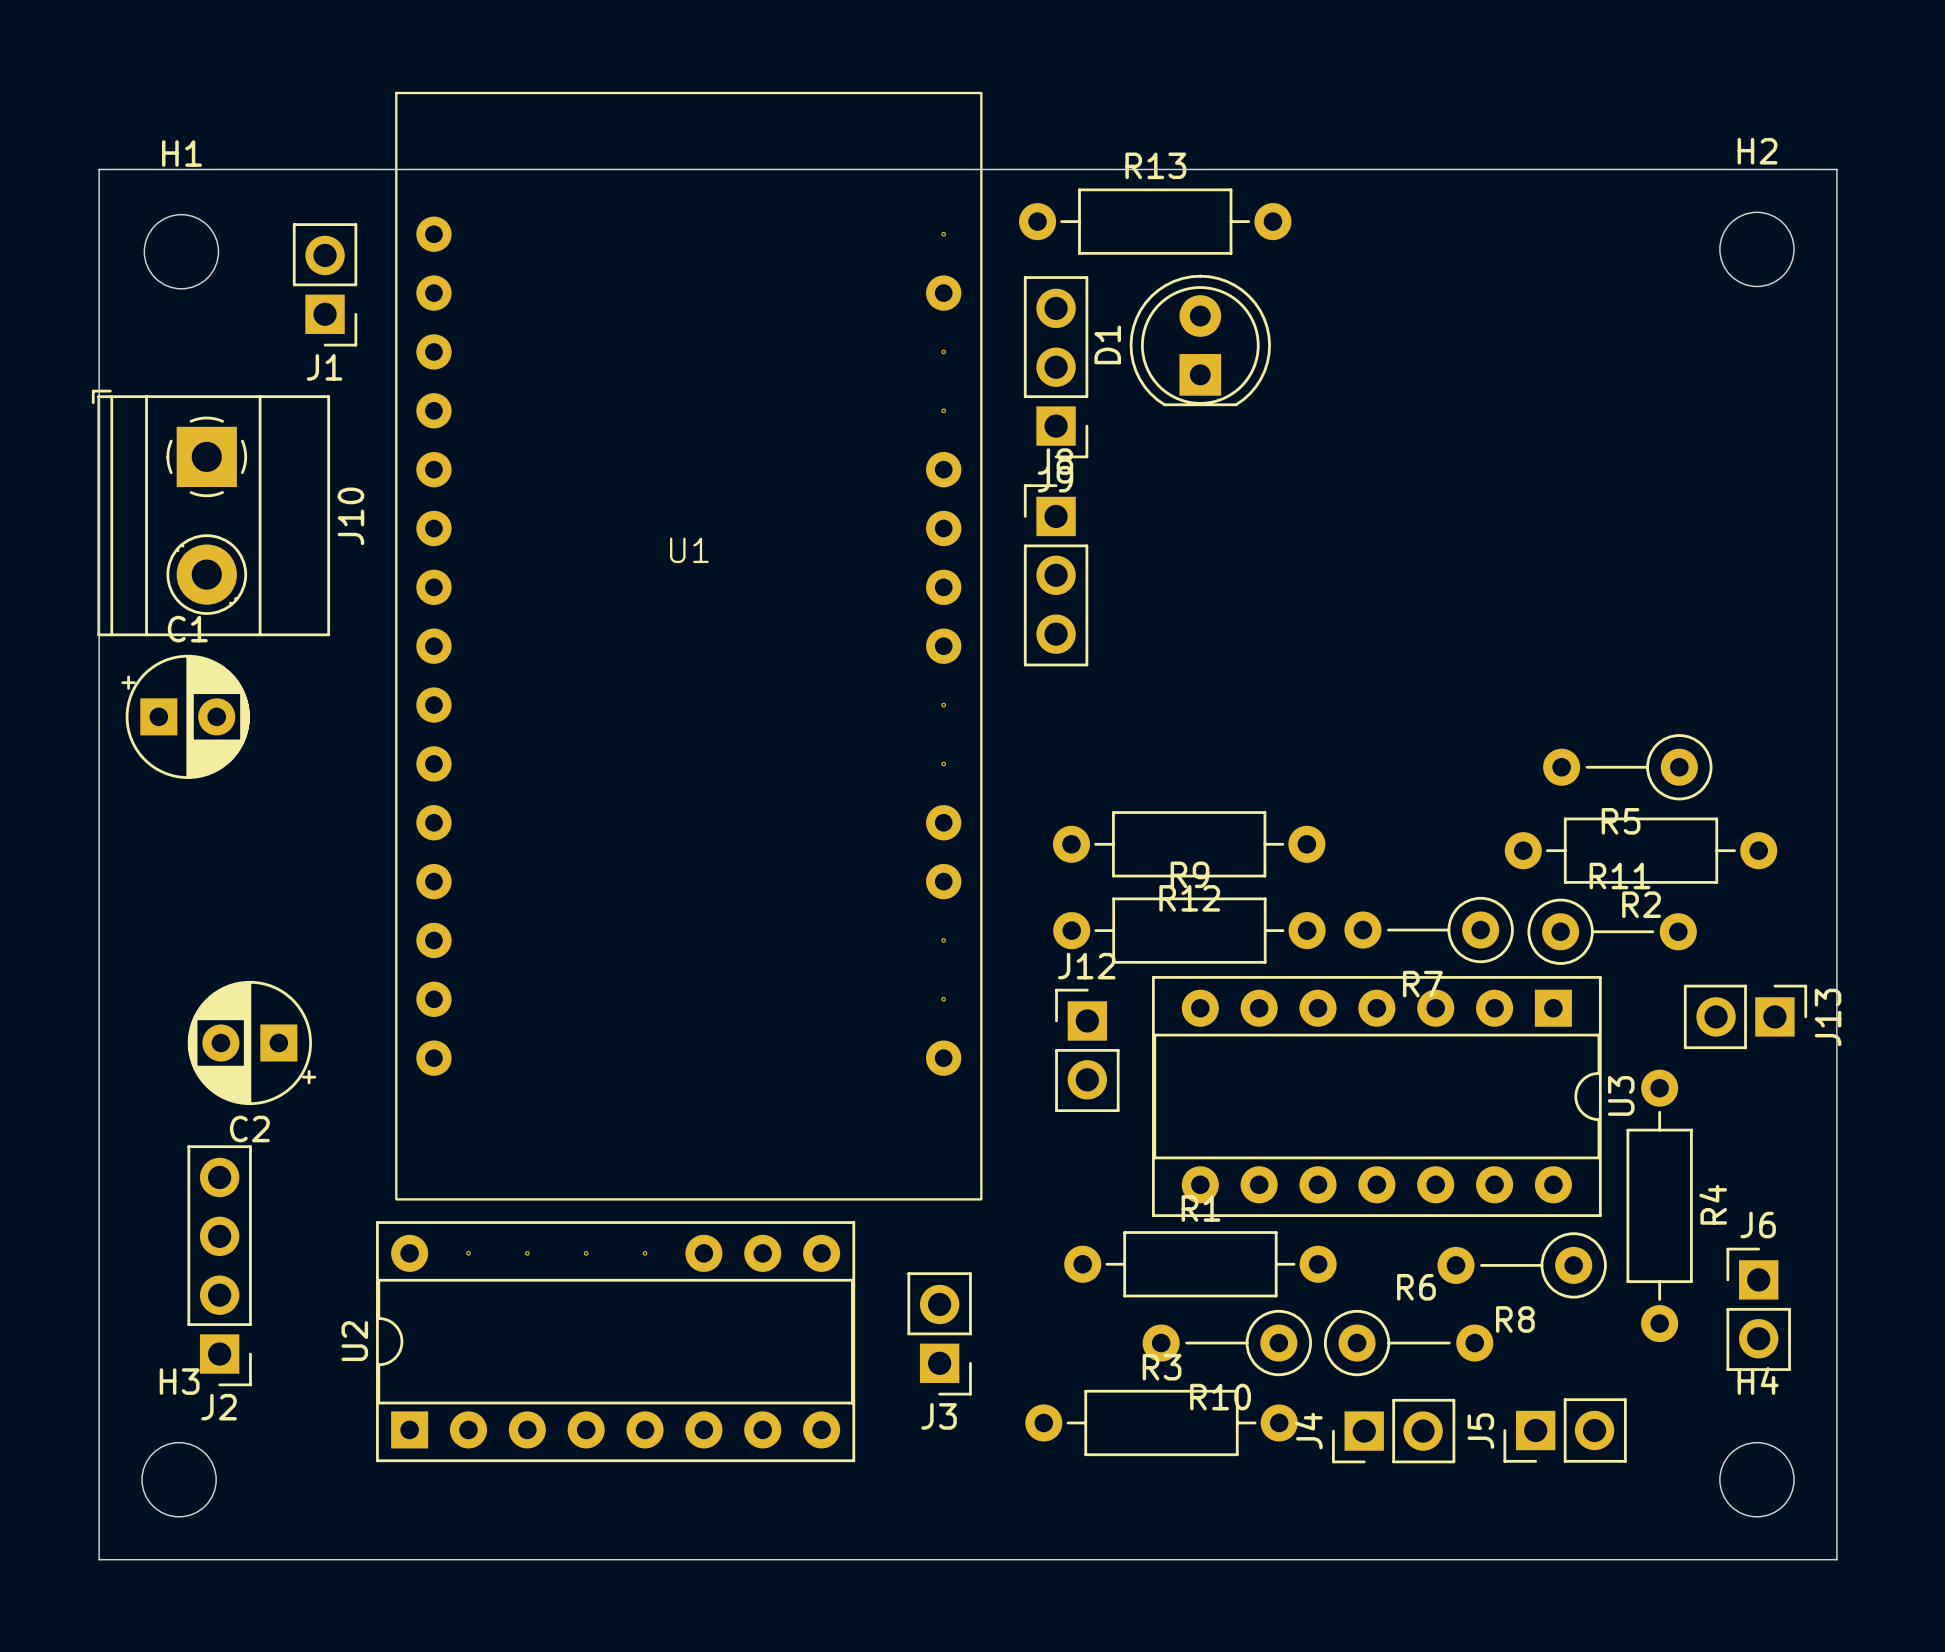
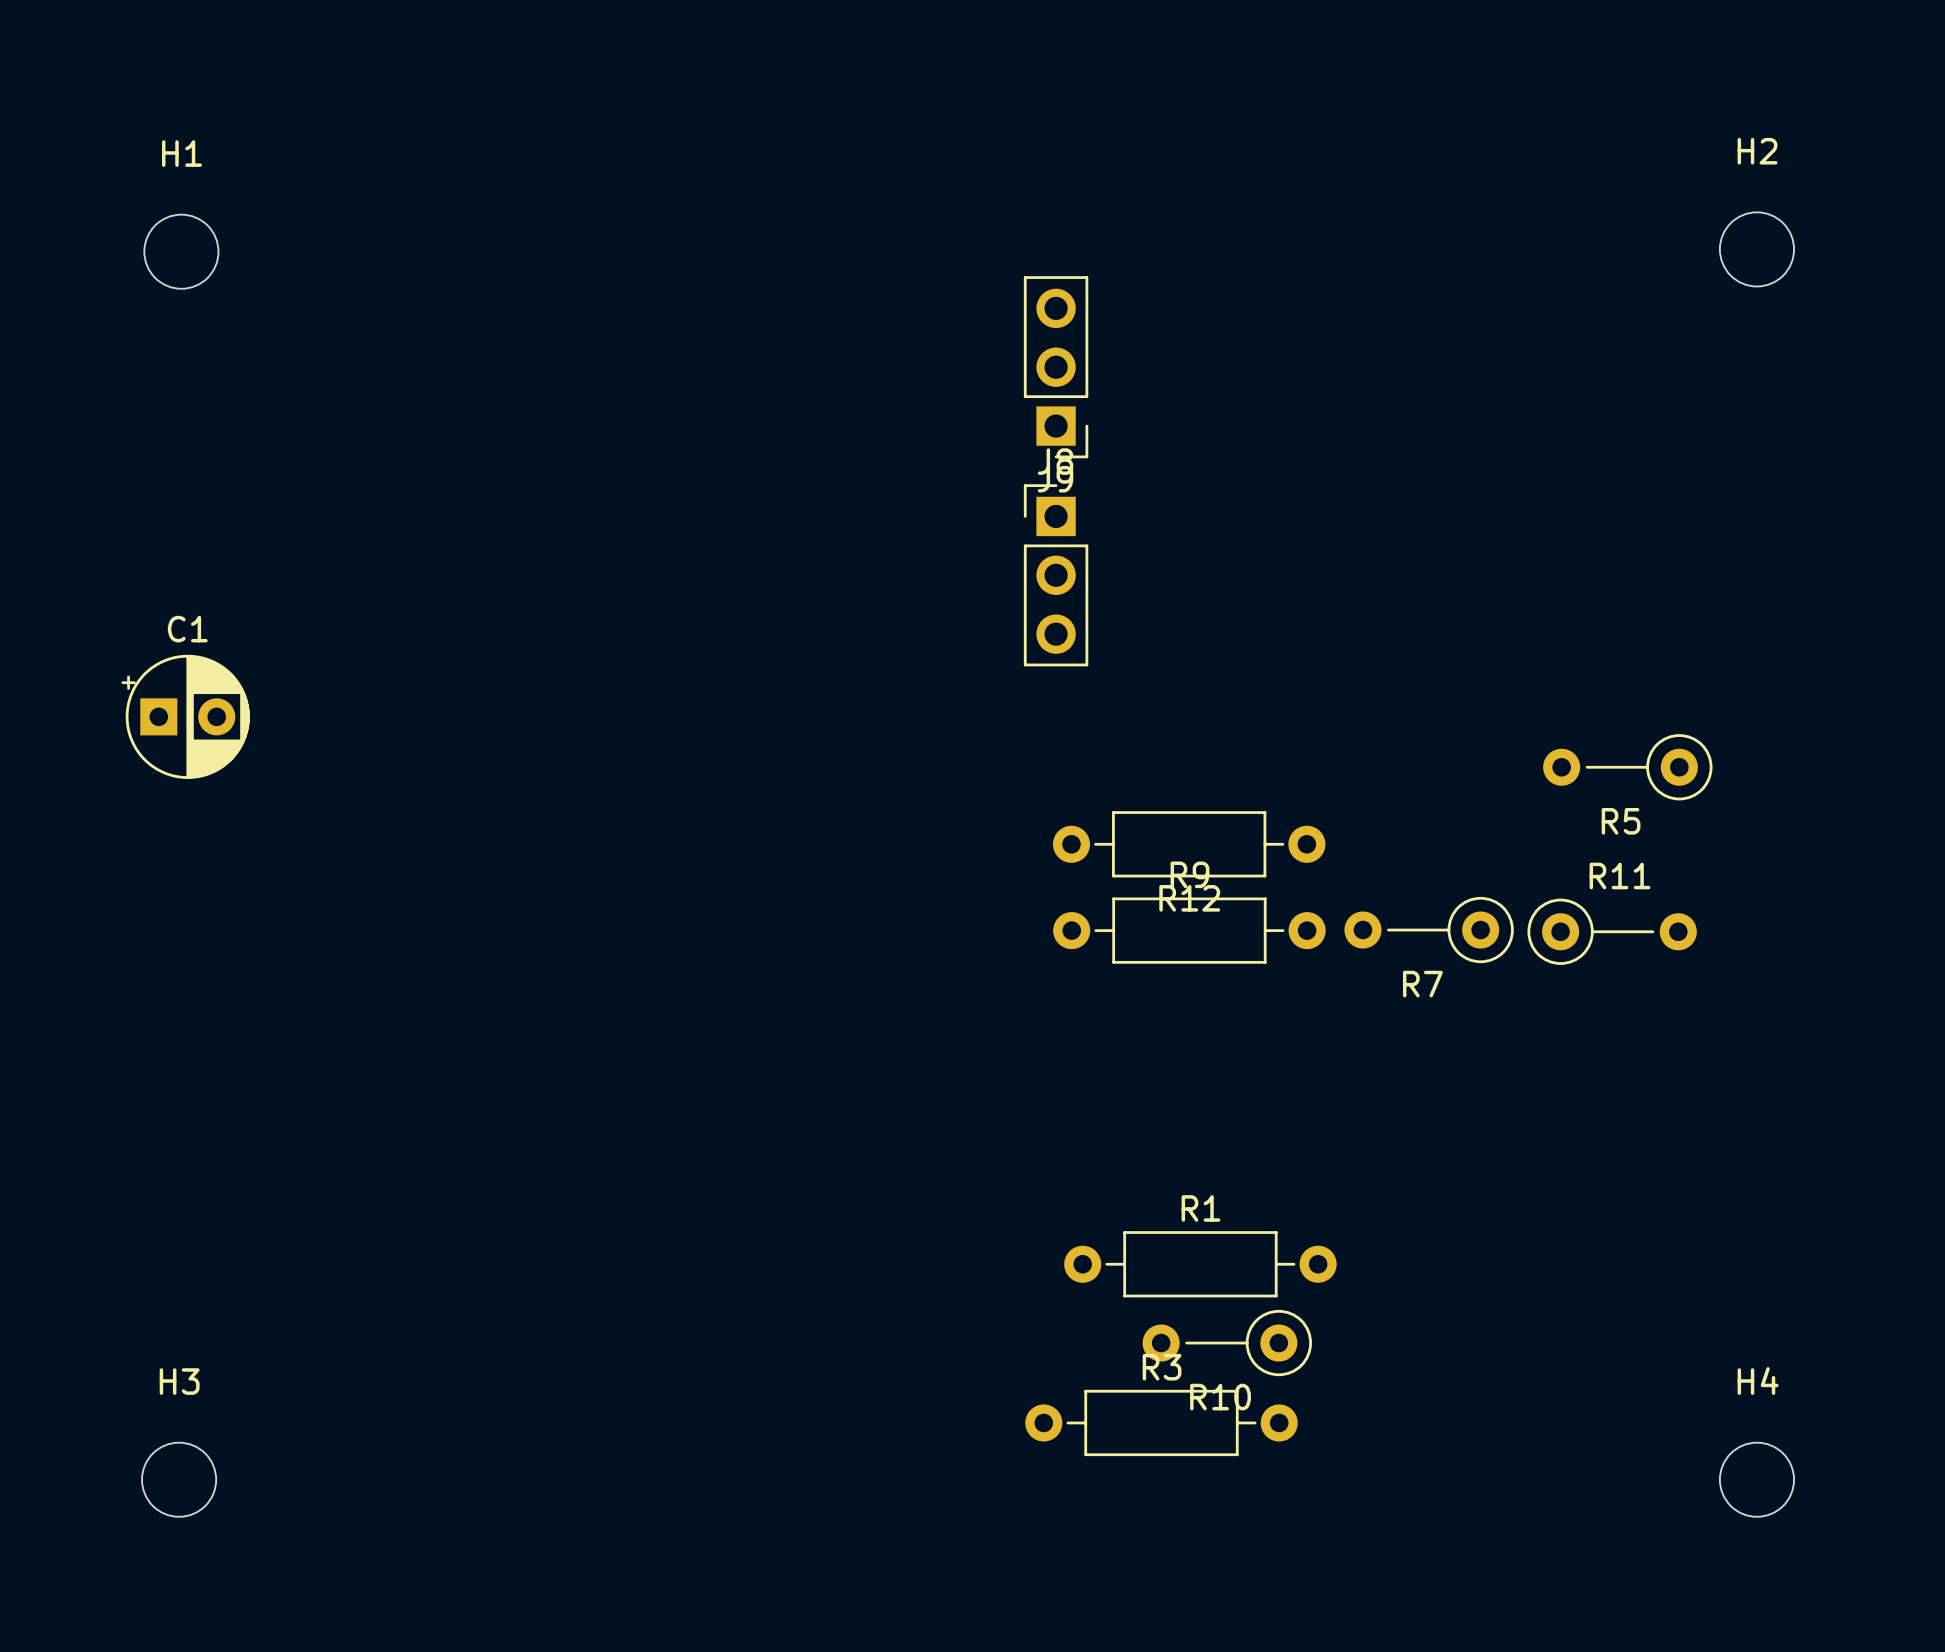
board edge: (99, 169) (1836, 169) (1836, 1559) (99, 1559) (99, 169) -> none
R13: (1155, 221) -> none
J1: (325, 284) -> none
D1: (1200, 340) -> none
J10: (210, 512) -> none
U1: (688, 646) -> none
R2: (1641, 850) -> none
J13: (1745, 1016) -> none
C2: (252, 1042) -> none
J12: (1087, 1050) -> none
U3: (1376, 1096) -> none
R4: (1659, 1205) -> none
J2: (219, 1265) -> none
R8: (1522, 1265) -> none
J6: (1758, 1309) -> none
J3: (939, 1333) -> none
U2: (615, 1341) -> none
R6: (1408, 1343) -> none
J5: (1565, 1430) -> none
J4: (1393, 1431) -> none

